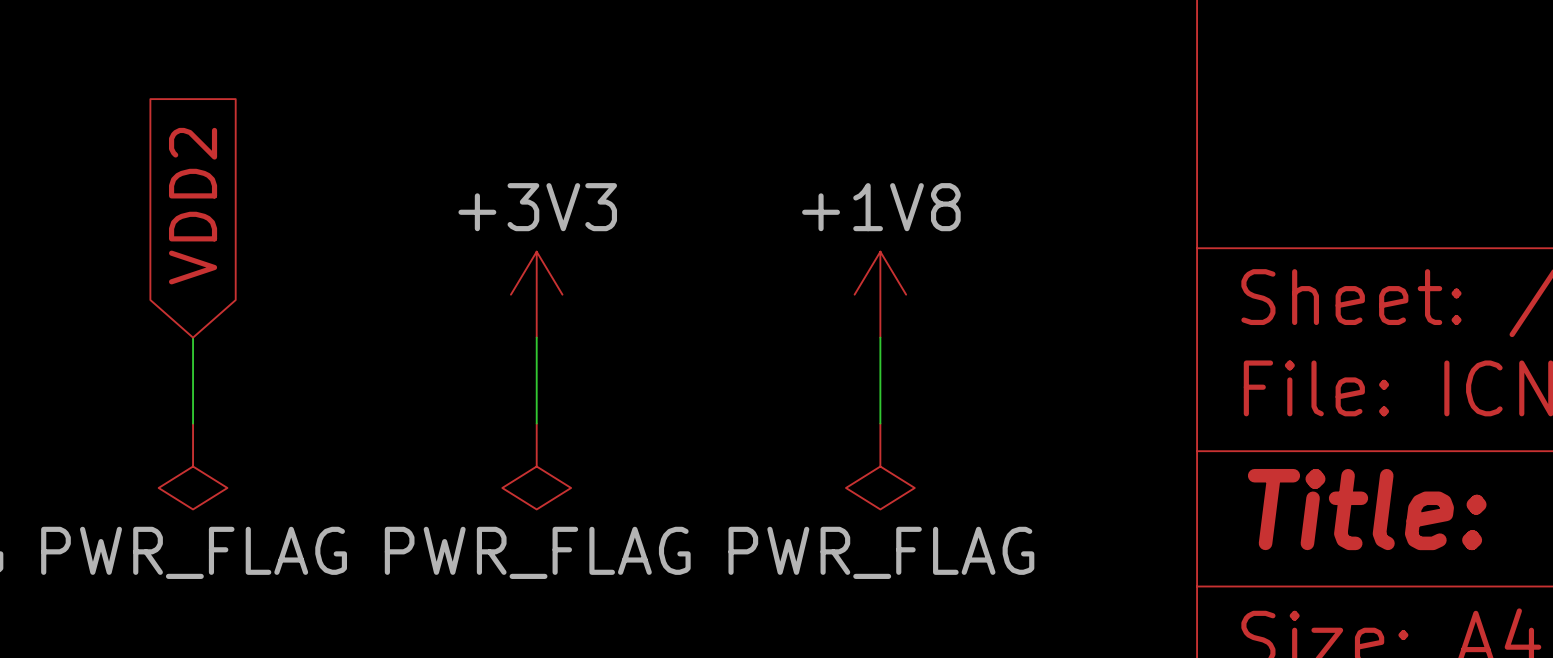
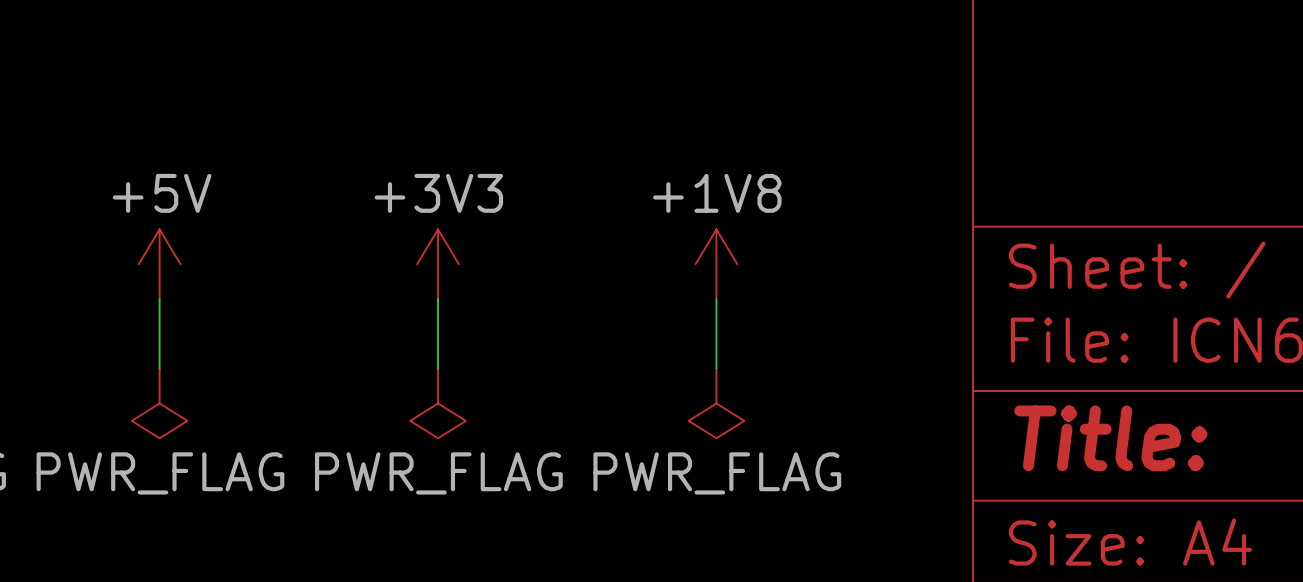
global label: VDD2 (193, 206) -> none
power symbol: none -> +5V (159, 264)

